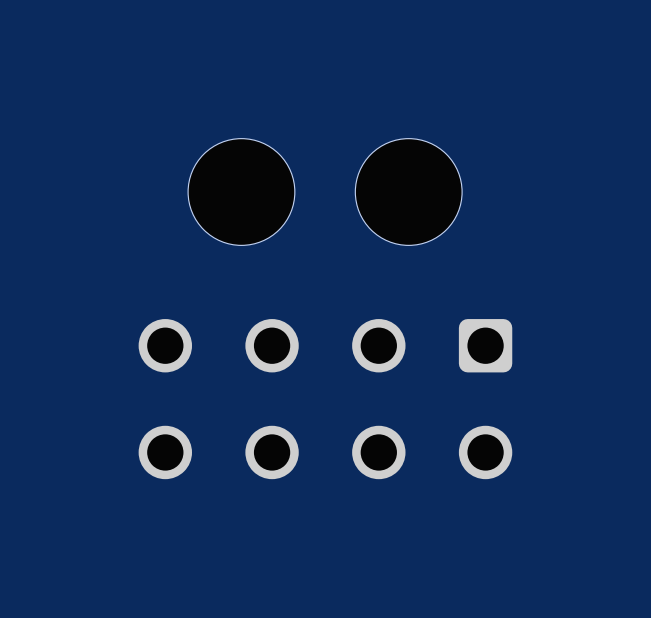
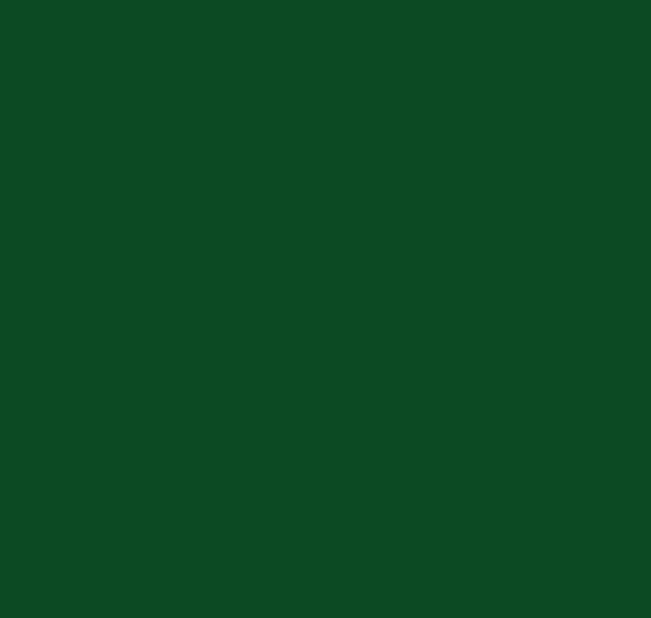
part: (325, 308) -> none

